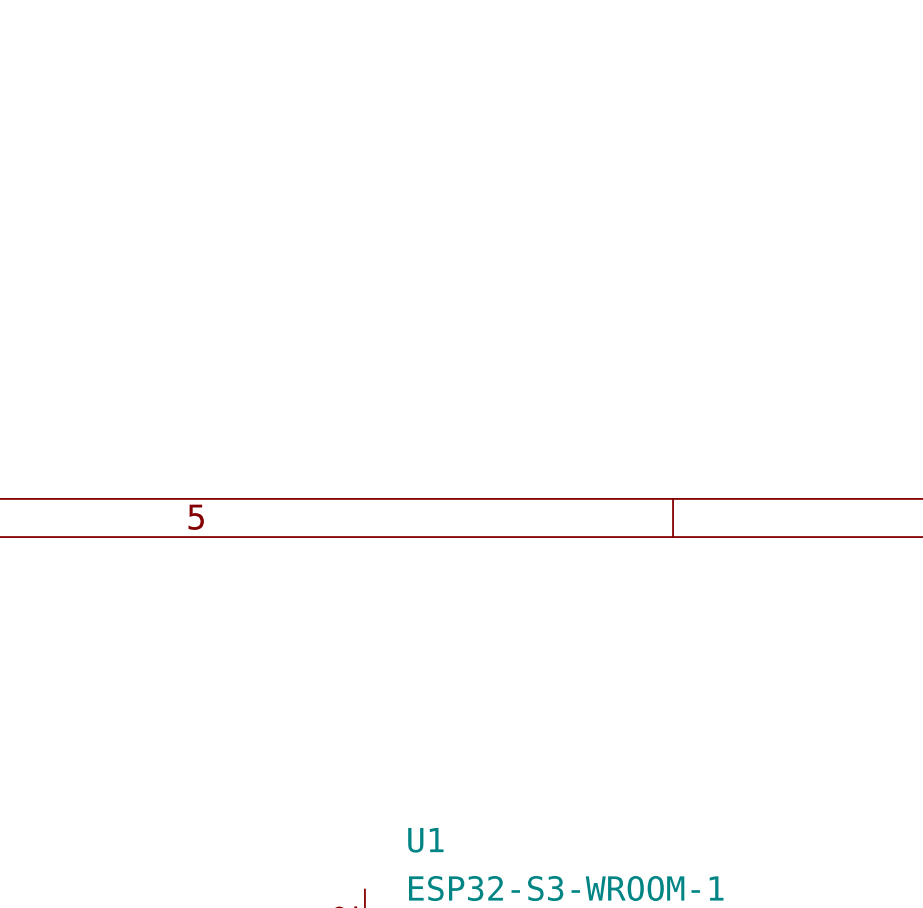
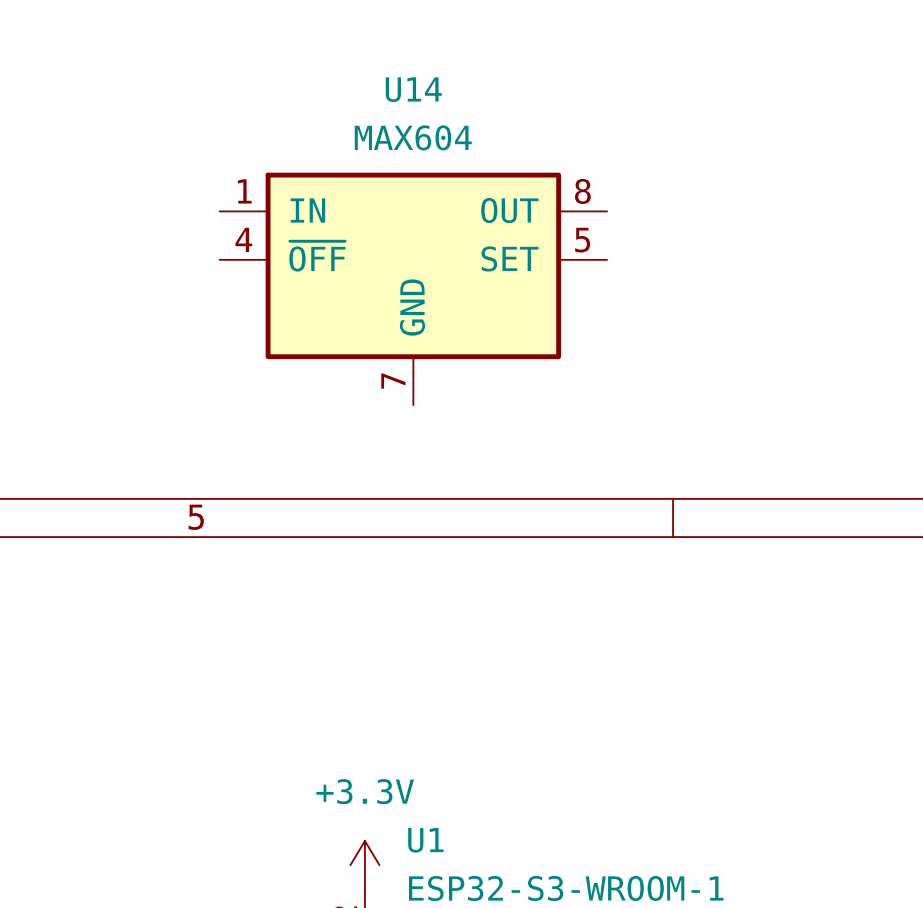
U14: none -> MAX604 (413, 288)
power symbol: none -> +3.3V (364, 865)

